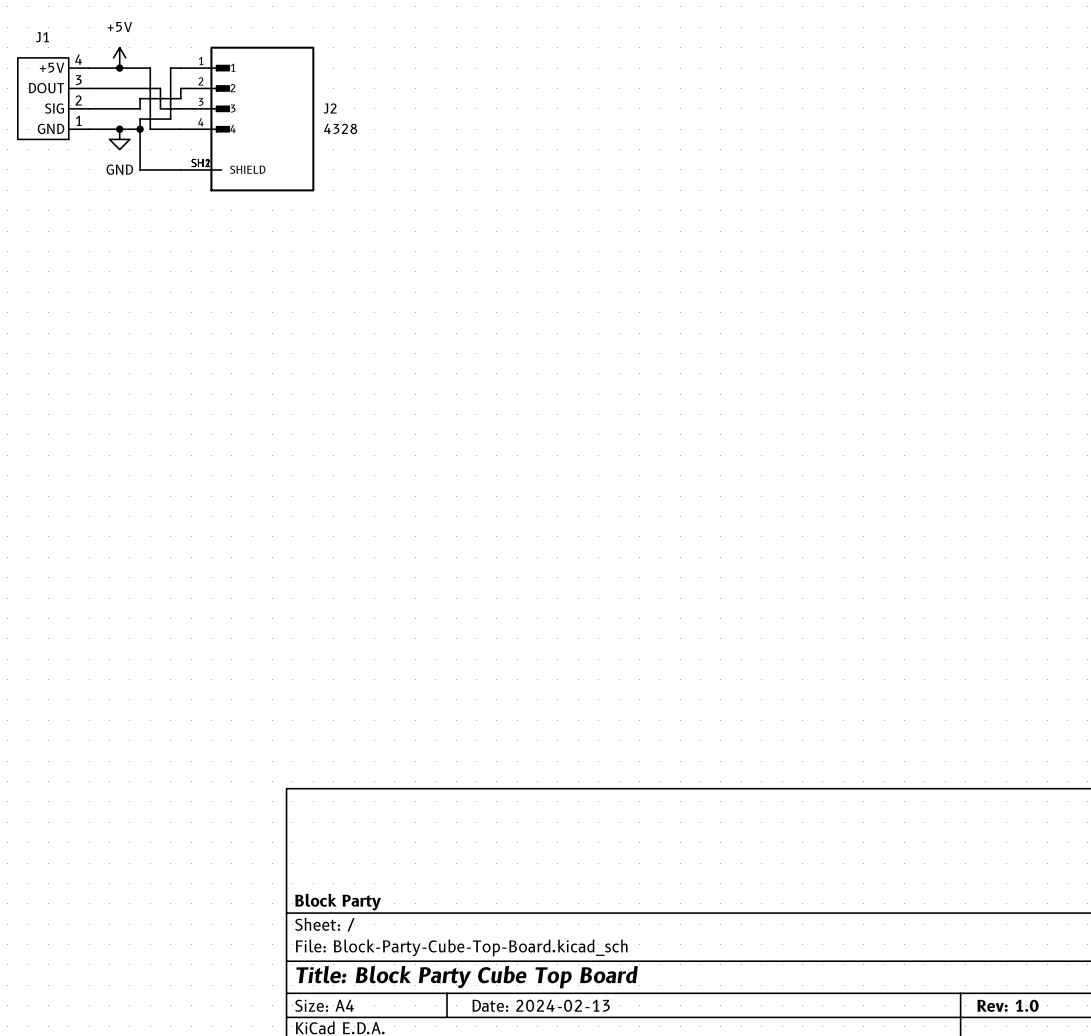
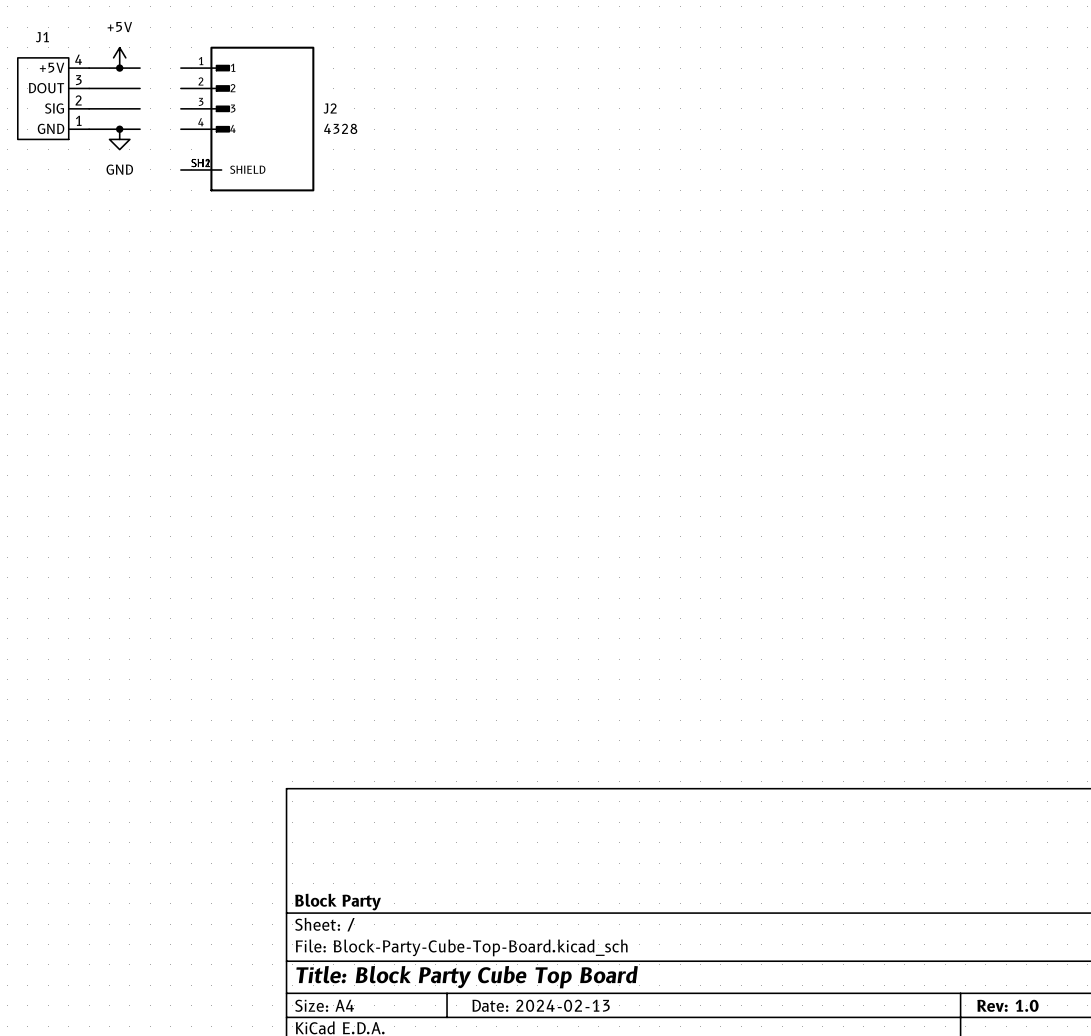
wire: (140, 68) (150, 68) (150, 129) (180, 129) -> none
wire: (180, 68) (170, 68) (170, 119) (140, 119) (140, 169) (180, 169) -> none
wire: (140, 88) (160, 88) (160, 108) (180, 108) -> none
wire: (180, 88) (180, 98) (140, 98) (140, 108) -> none
junction: (140, 129) -> none

